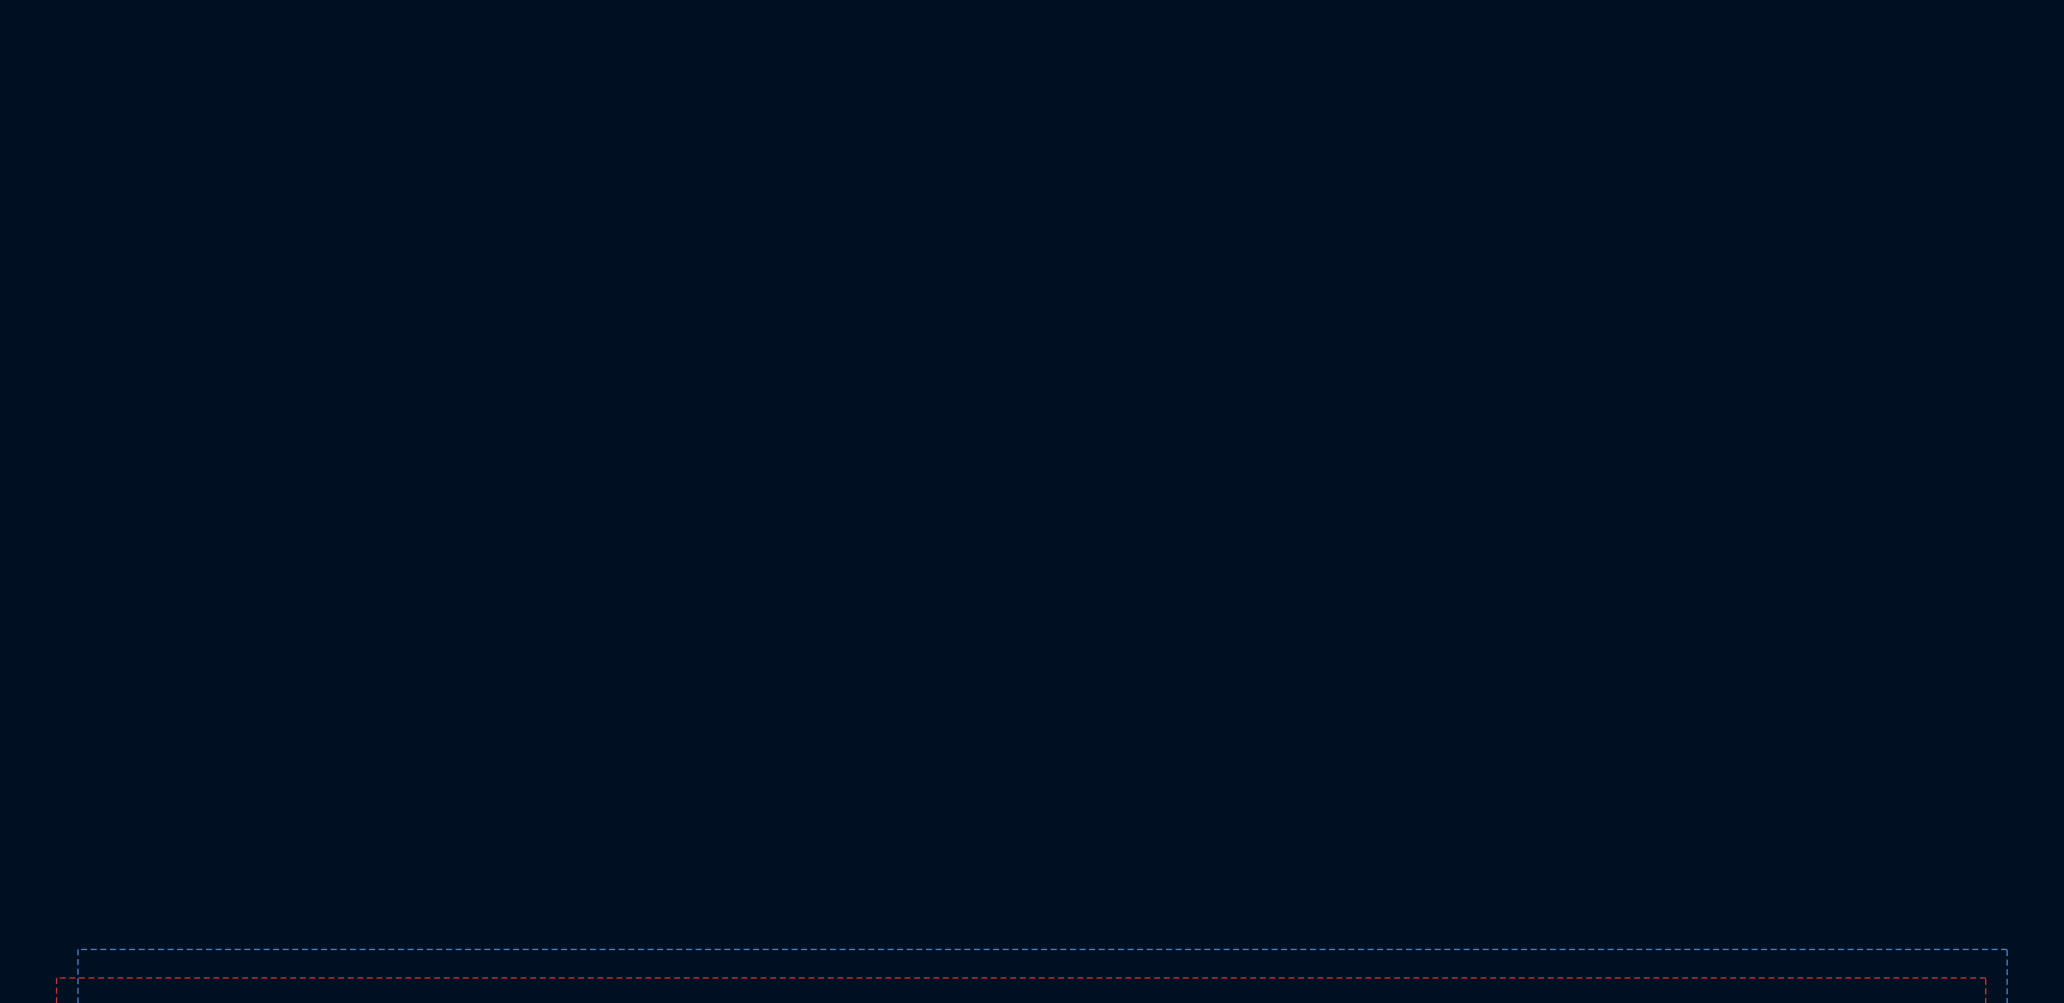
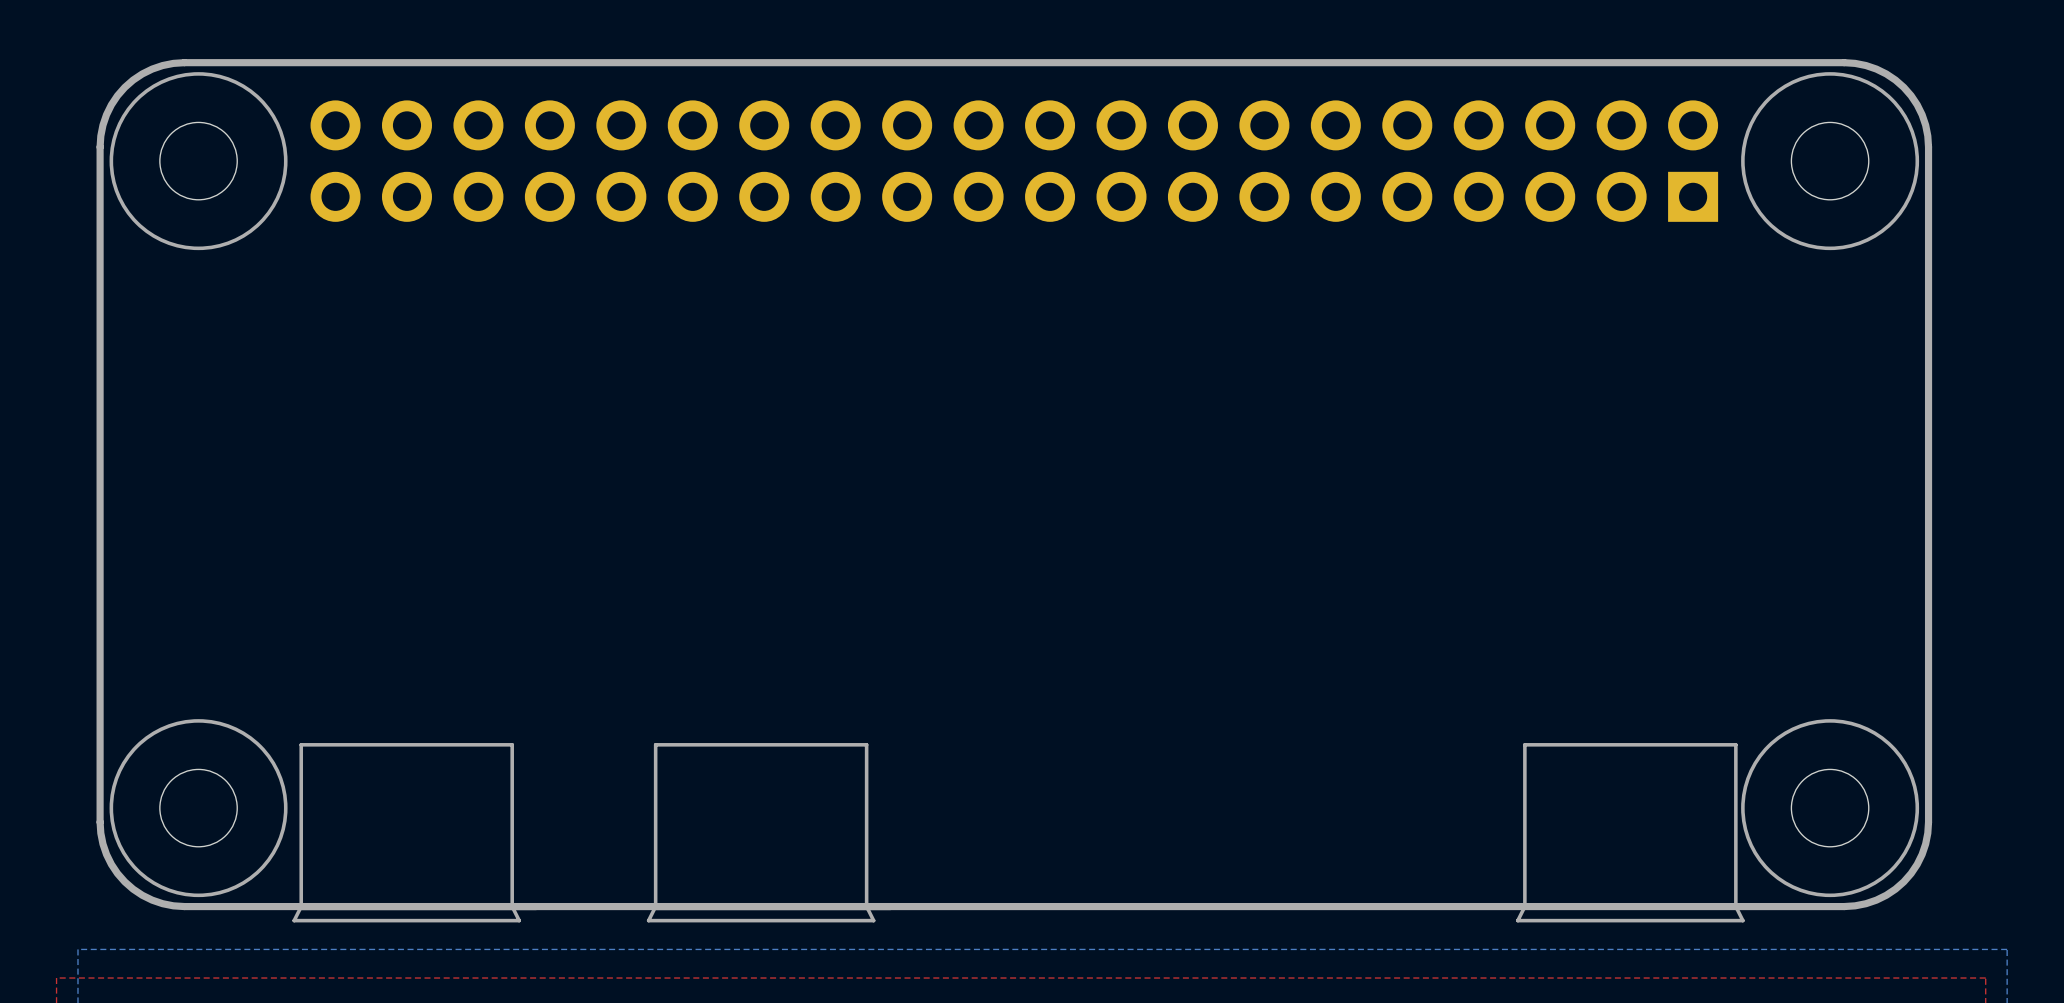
part: none -> (1014, 490)

